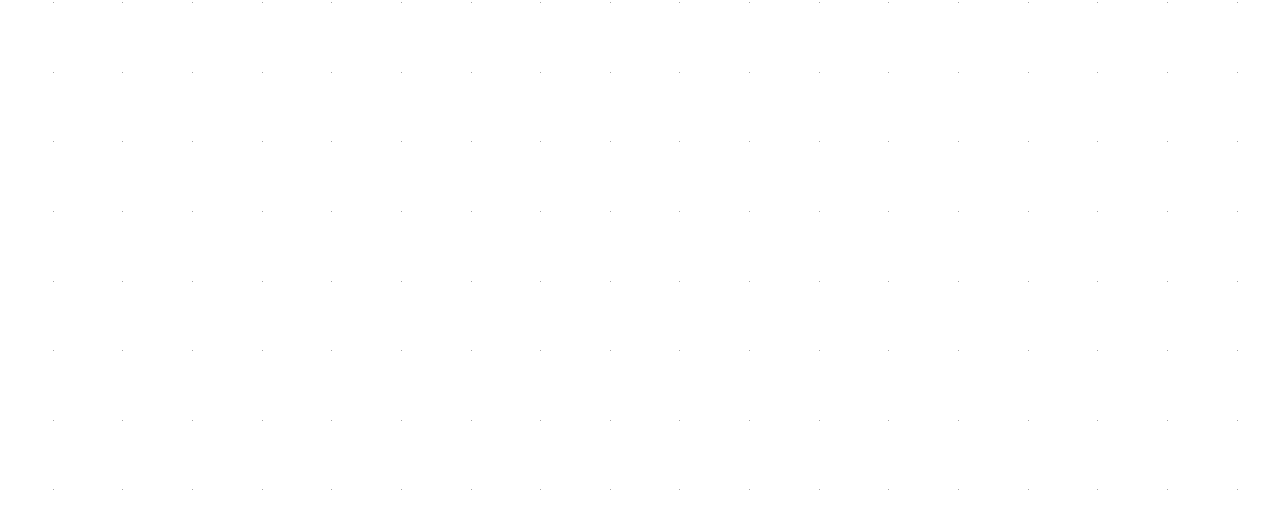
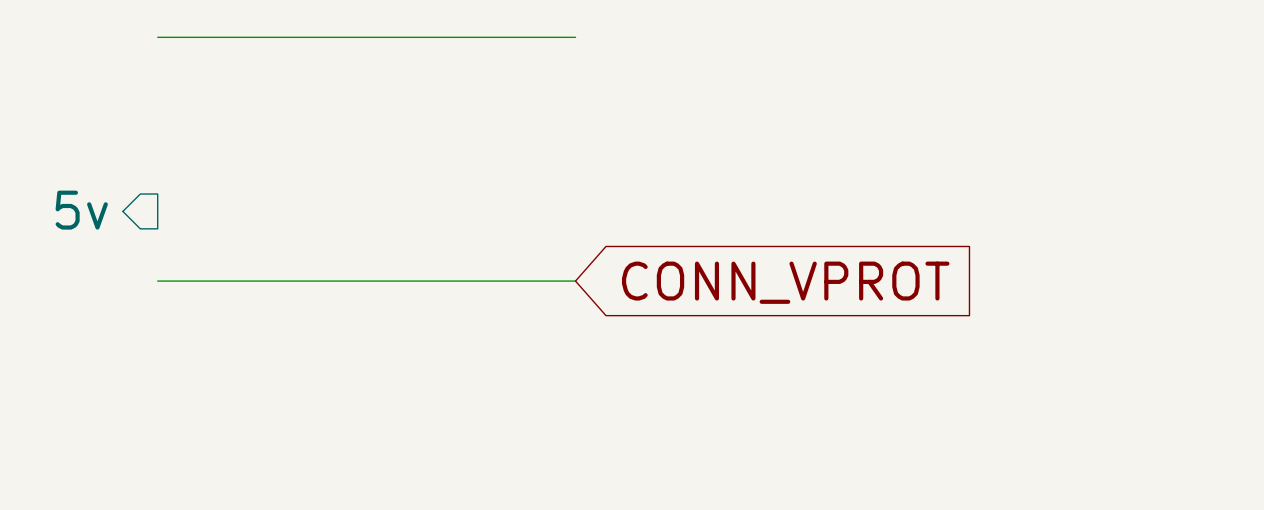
wire: none -> (157, 37) (575, 37)
sheet pin: none -> 5v (81, 210)
wire: none -> (157, 281) (575, 281)
global label: none -> CONN_VPROT (785, 282)

